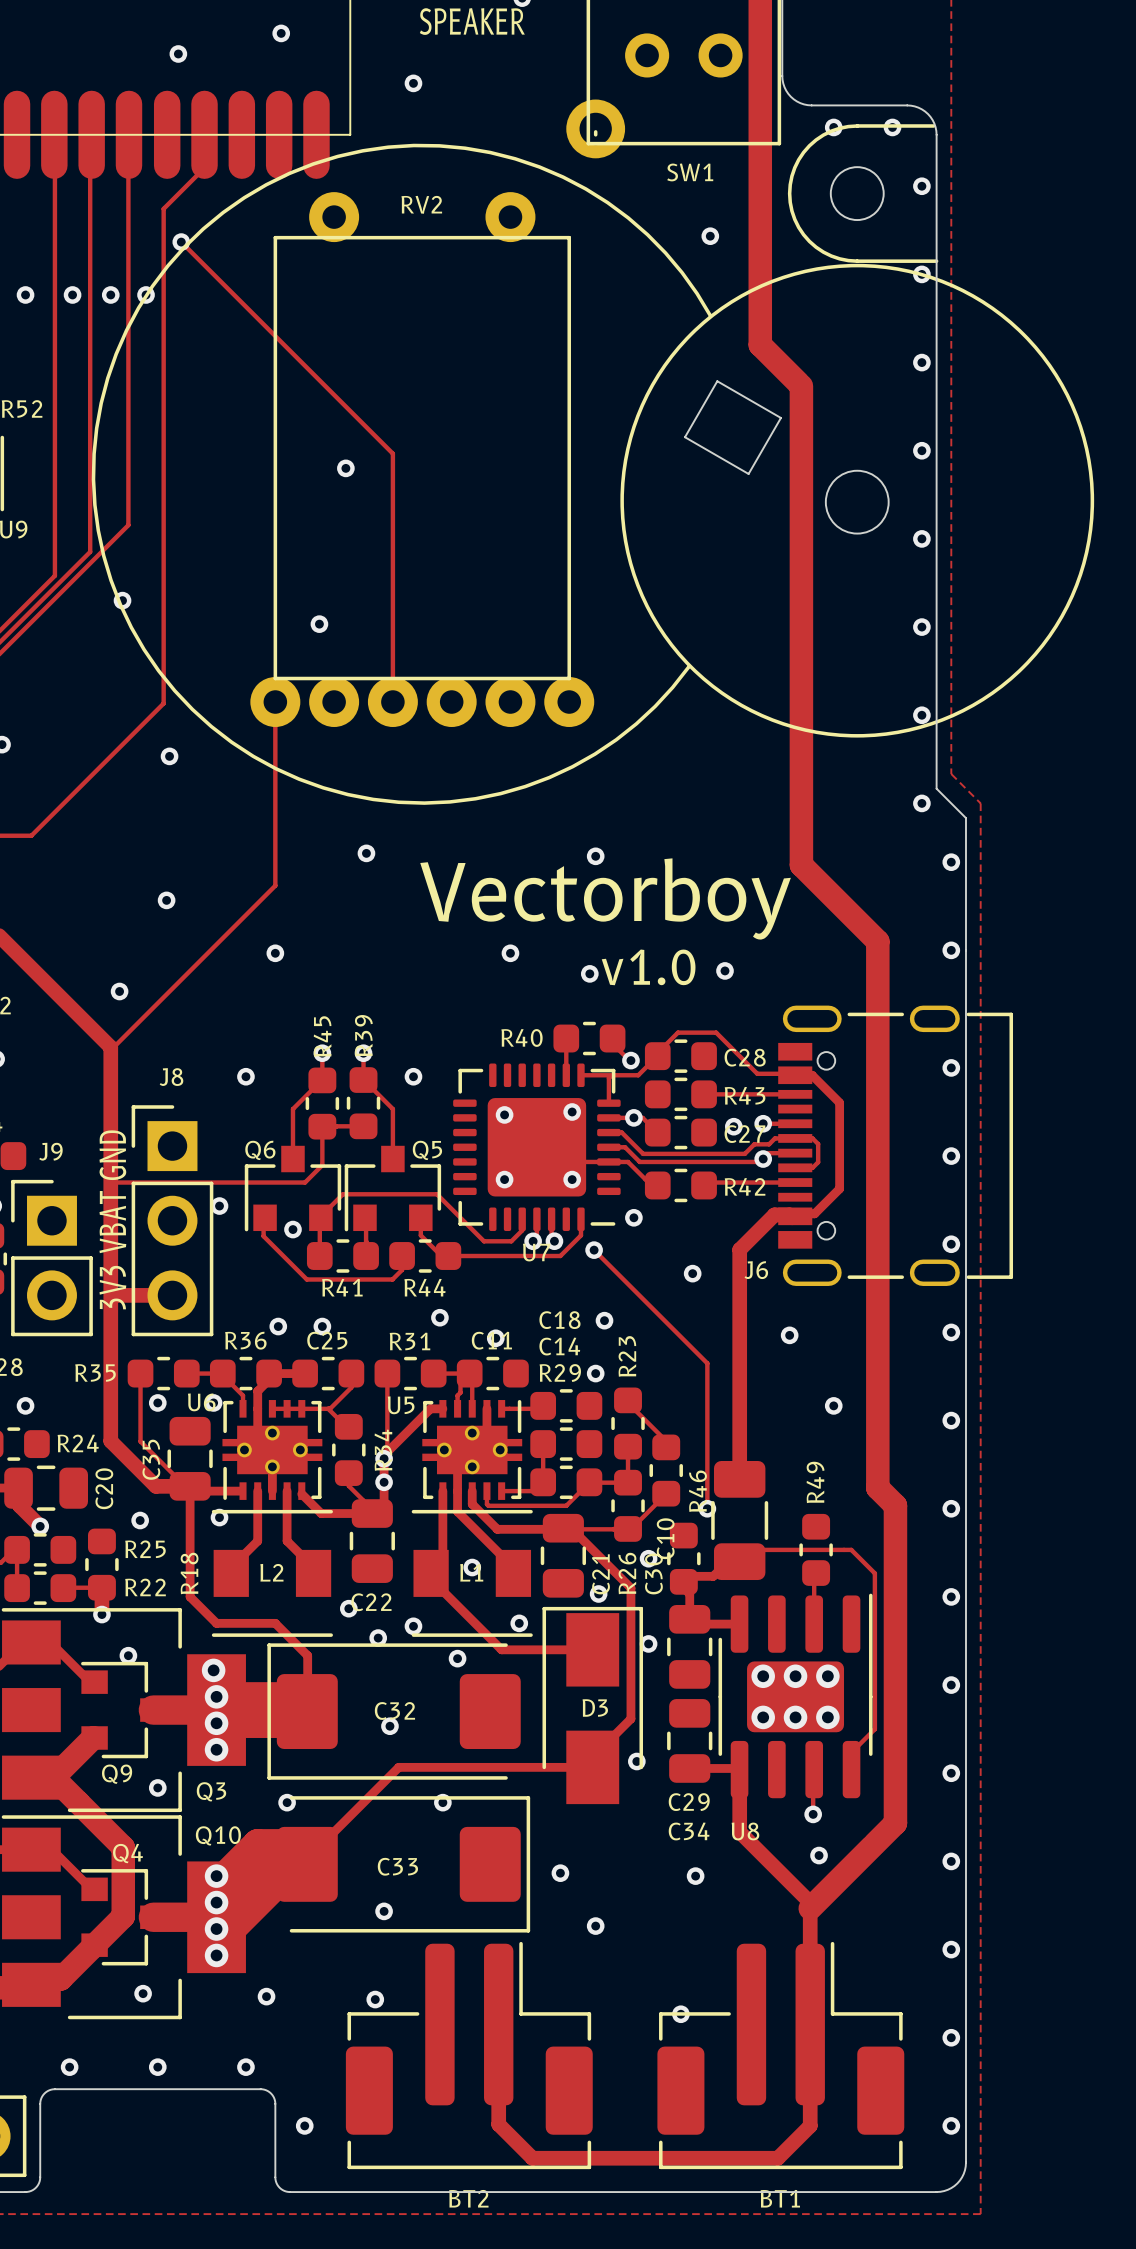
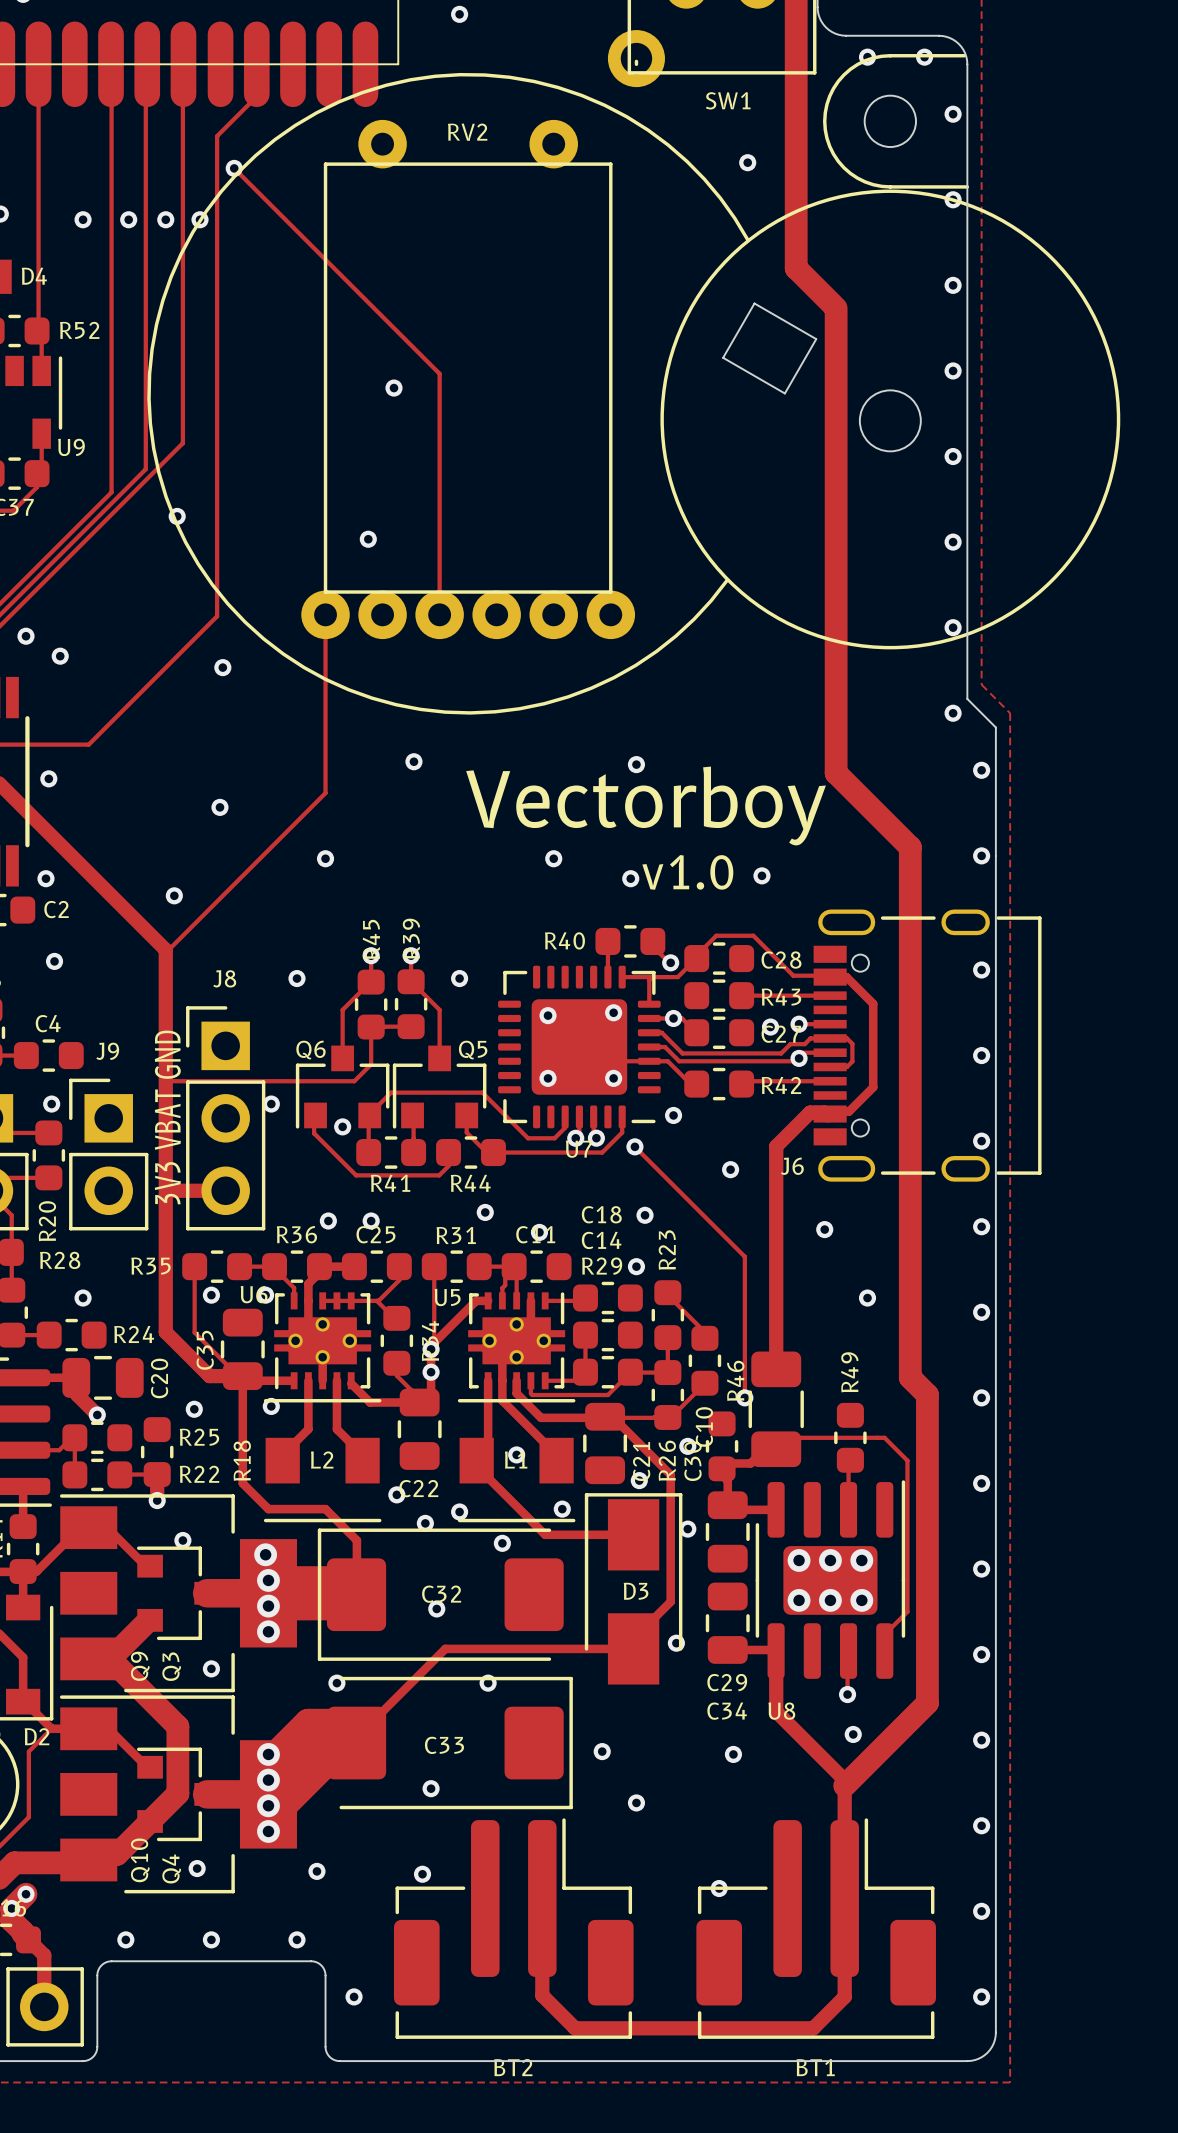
Q9 name rotation: 0° (117, 1774) -> 90° counterclockwise (140, 1666)
Q3 name rotation: 0° (211, 1791) -> 90° counterclockwise (171, 1666)
Q3 name position: Q3 (211, 1791) -> Q3 (171, 1666)
Q10 name rotation: 0° (218, 1835) -> 90° counterclockwise (140, 1860)
Q10 name position: Q10 (218, 1835) -> Q10 (140, 1860)
Q4 name rotation: 0° (127, 1853) -> 90° counterclockwise (171, 1868)
Q4 name position: Q4 (127, 1853) -> Q4 (171, 1868)

